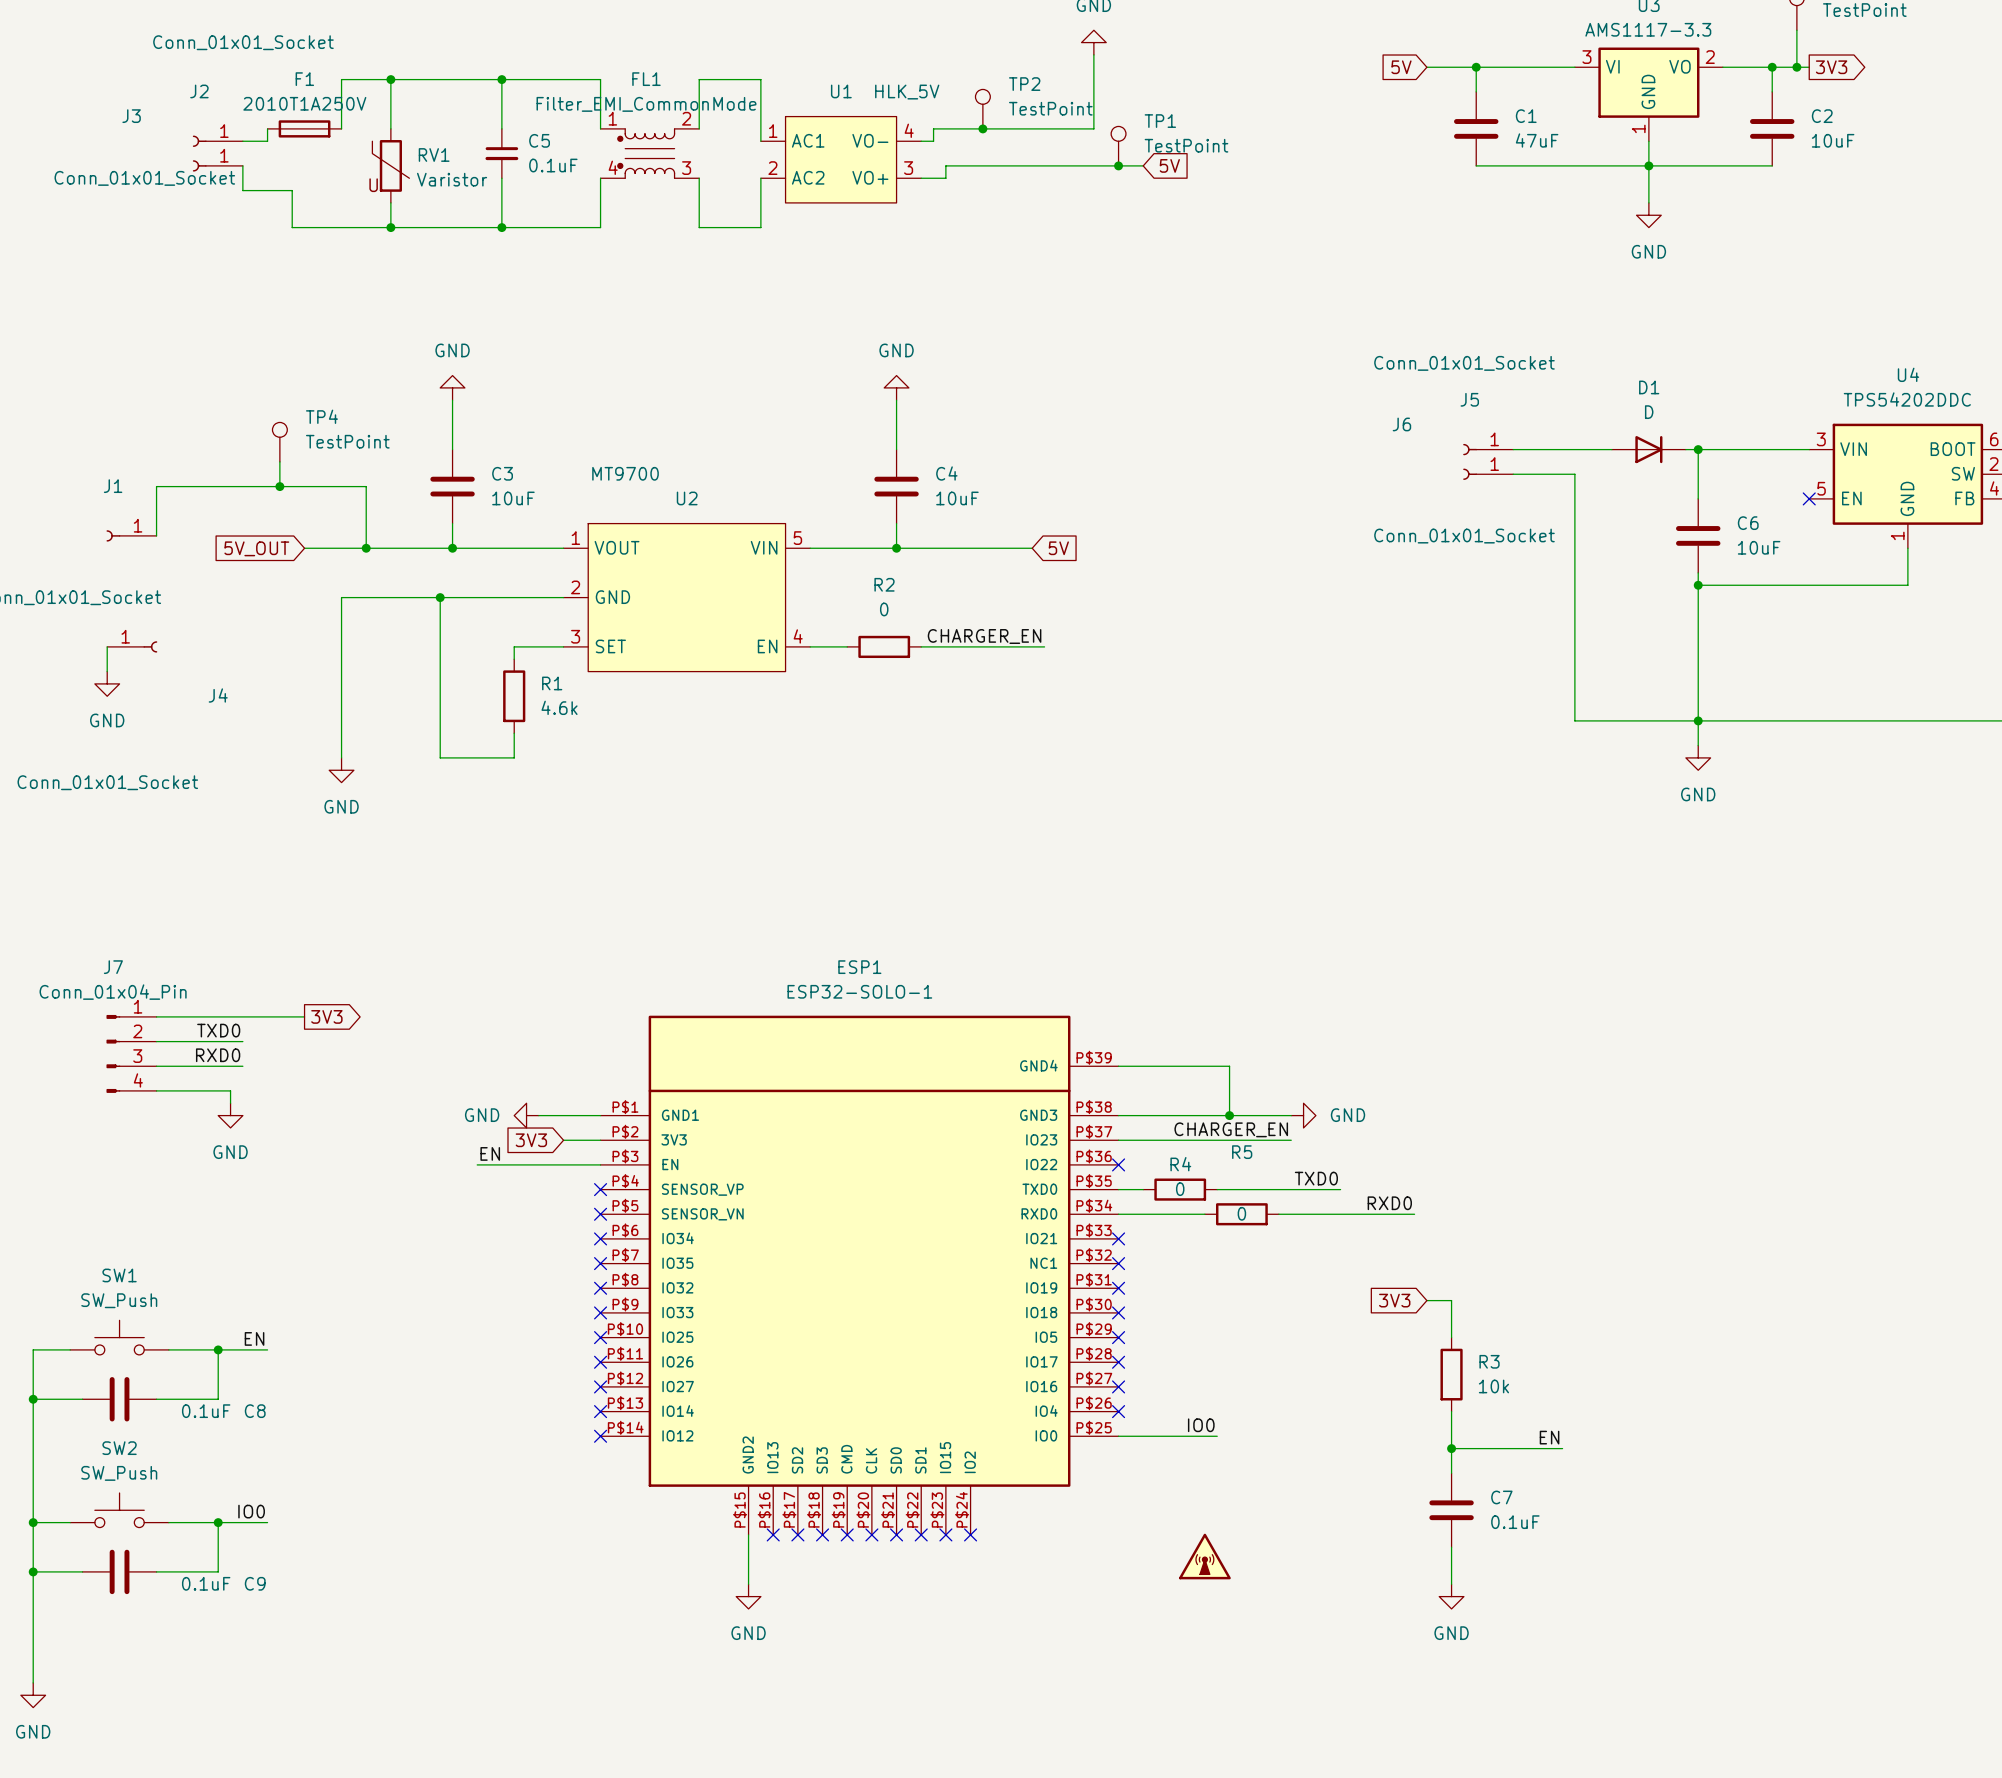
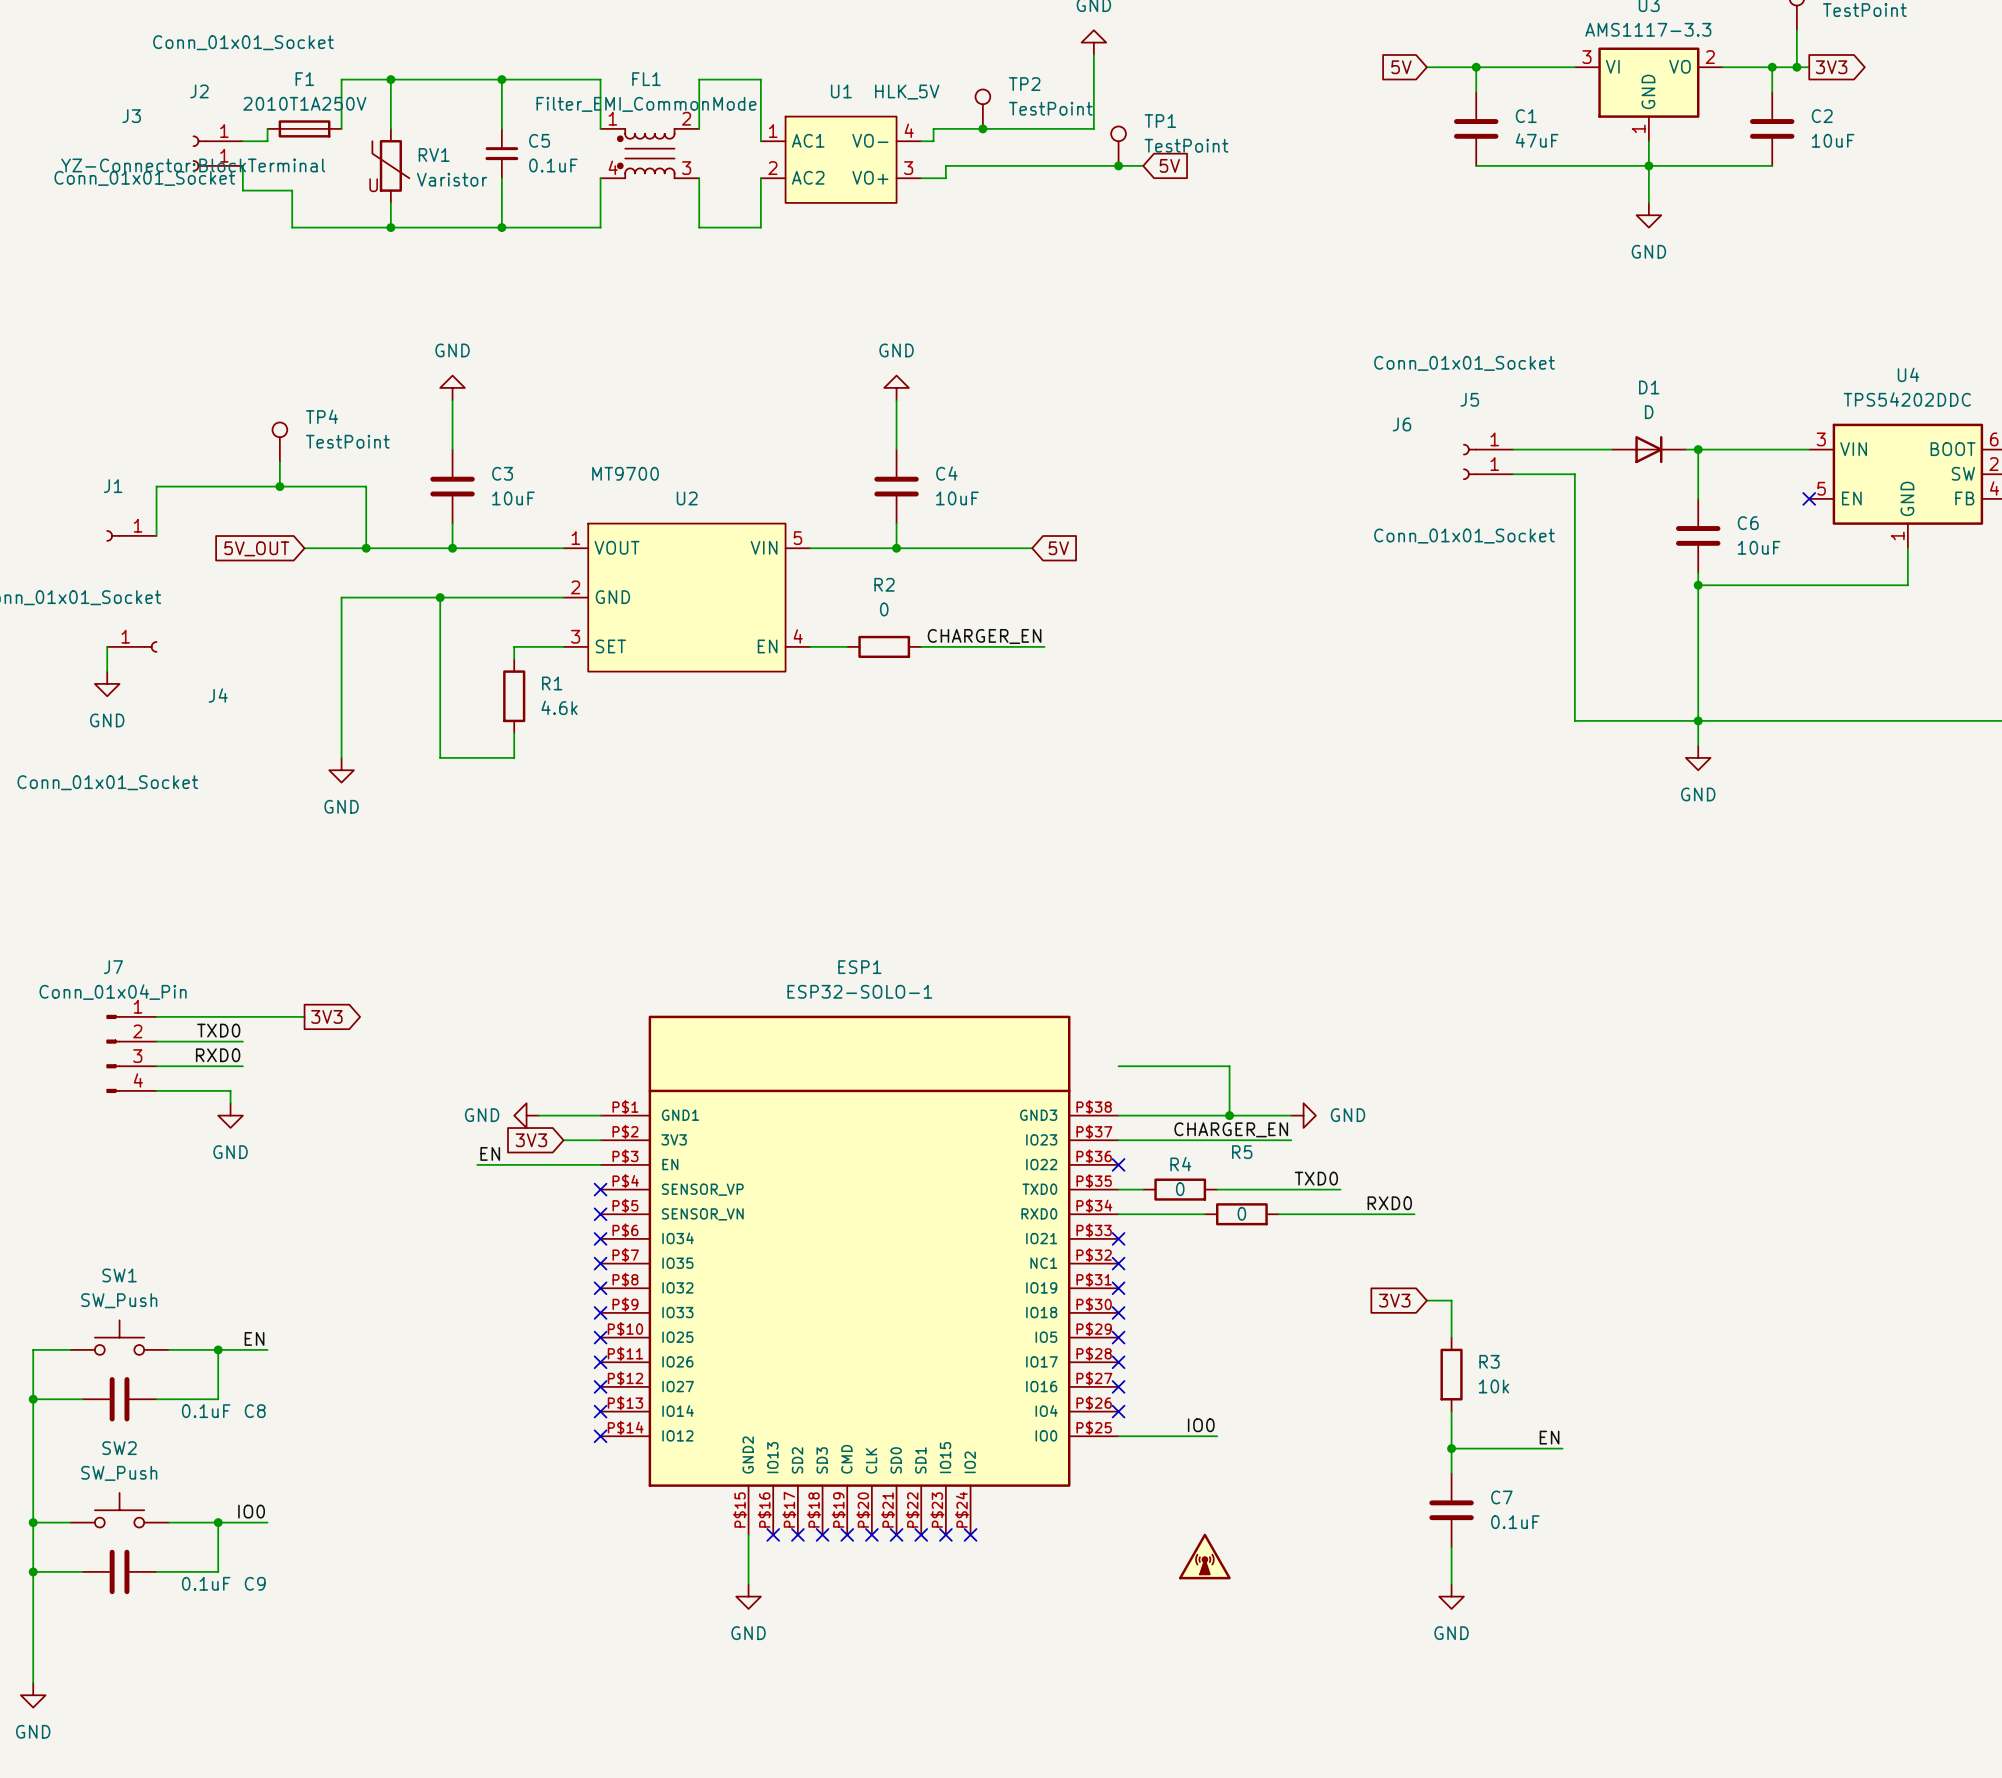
J3 text: none -> YZ-Connector:BlockTerminal (193, 165)
ESP1 symbol: [600, 1015, 1119, 1535] -> [600, 1015, 1119, 1535]

